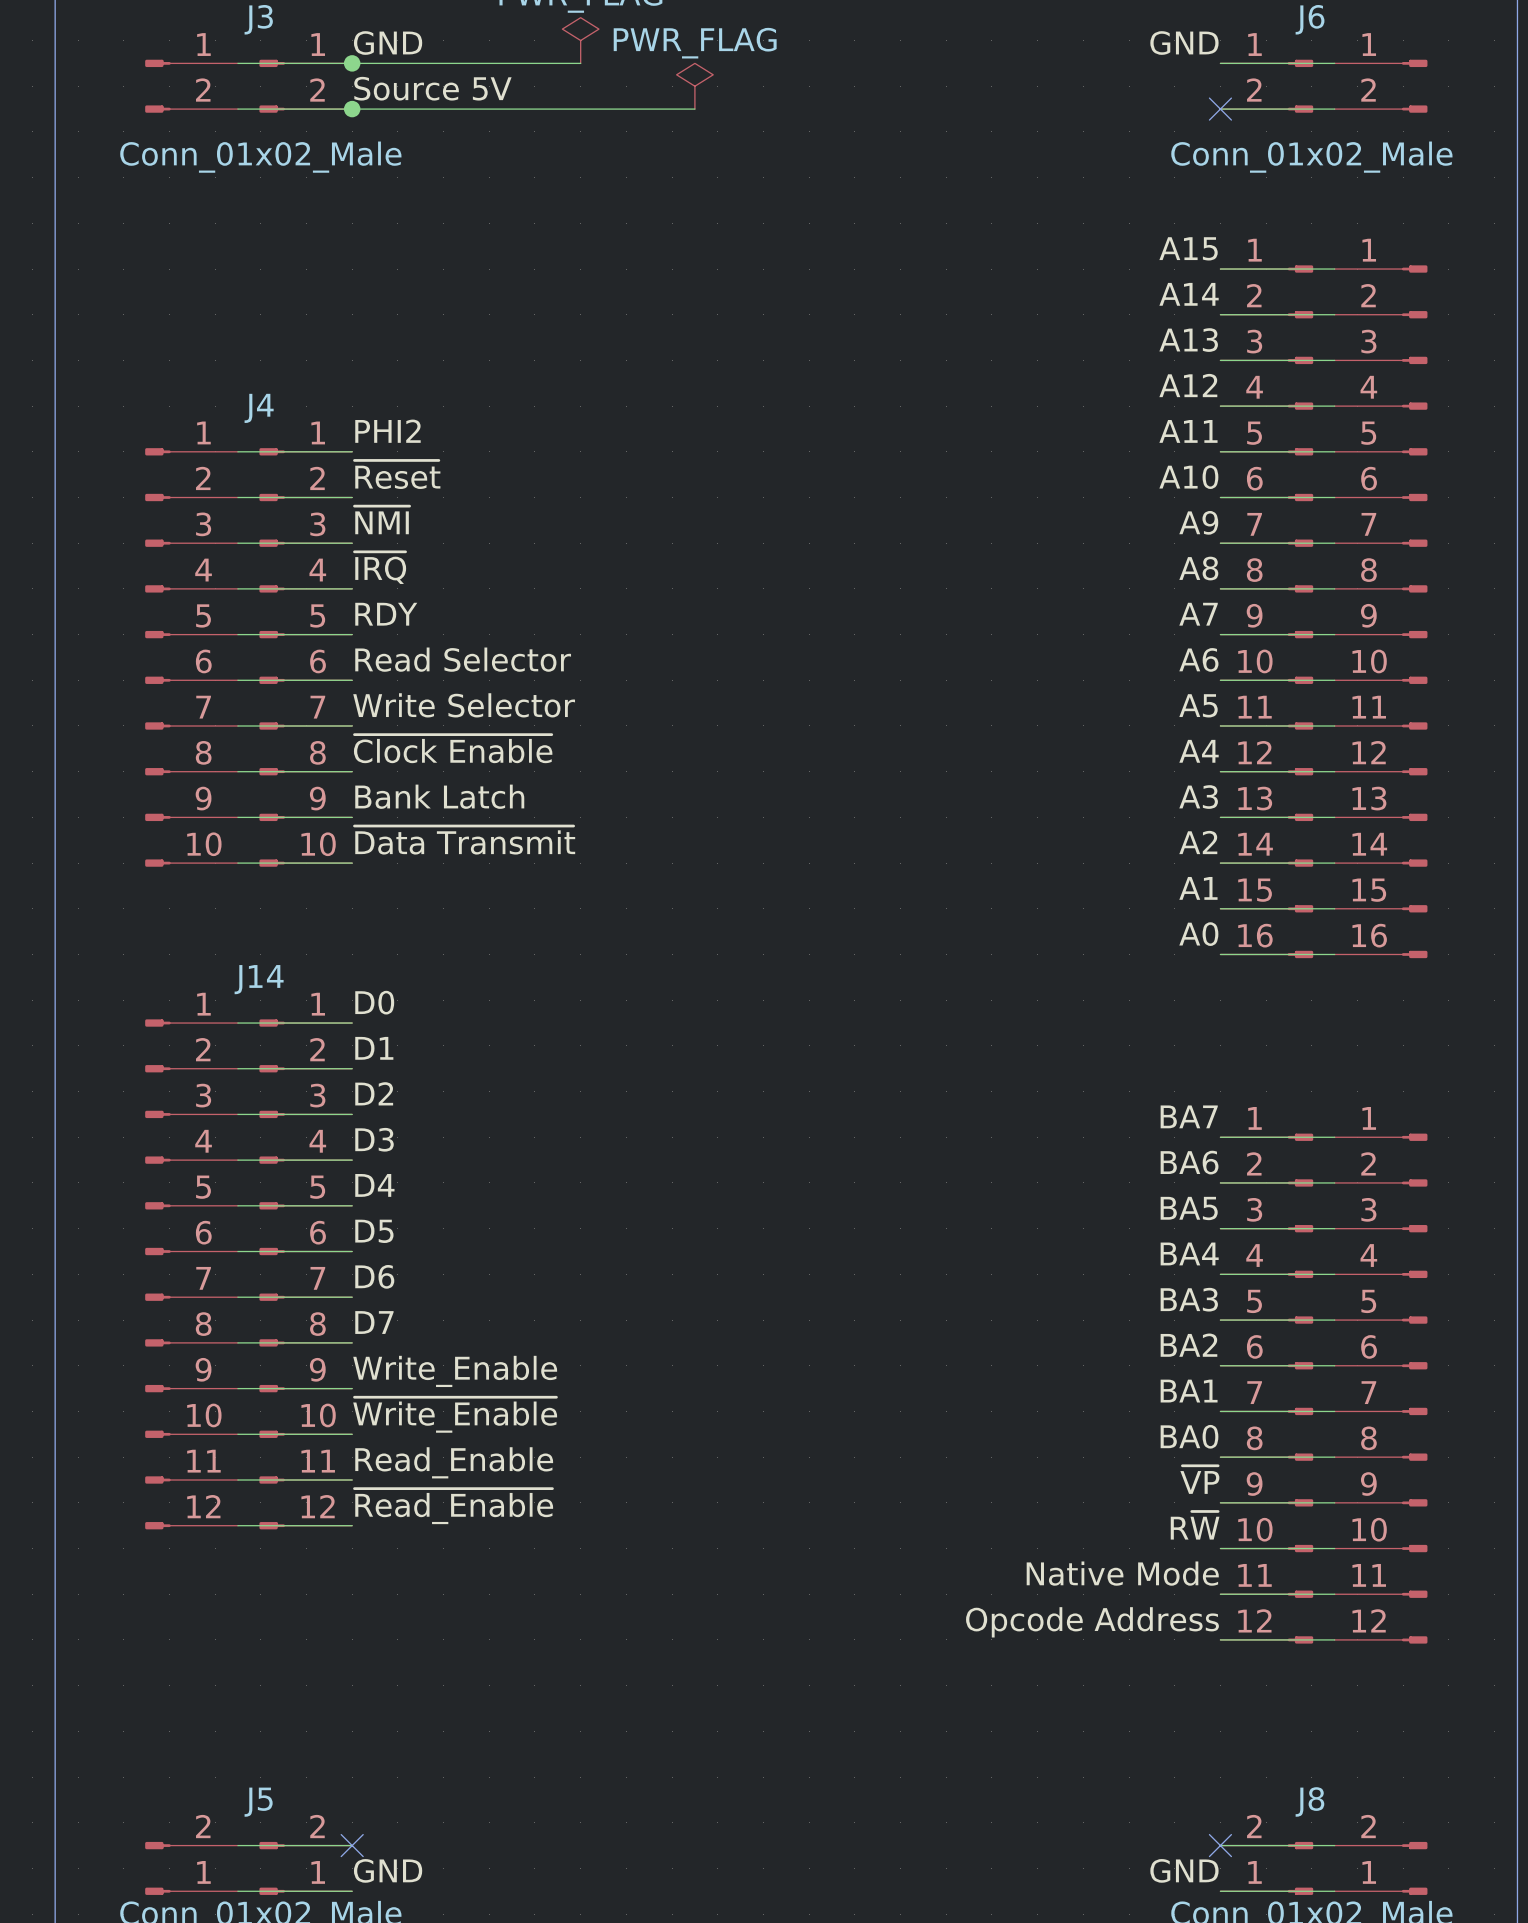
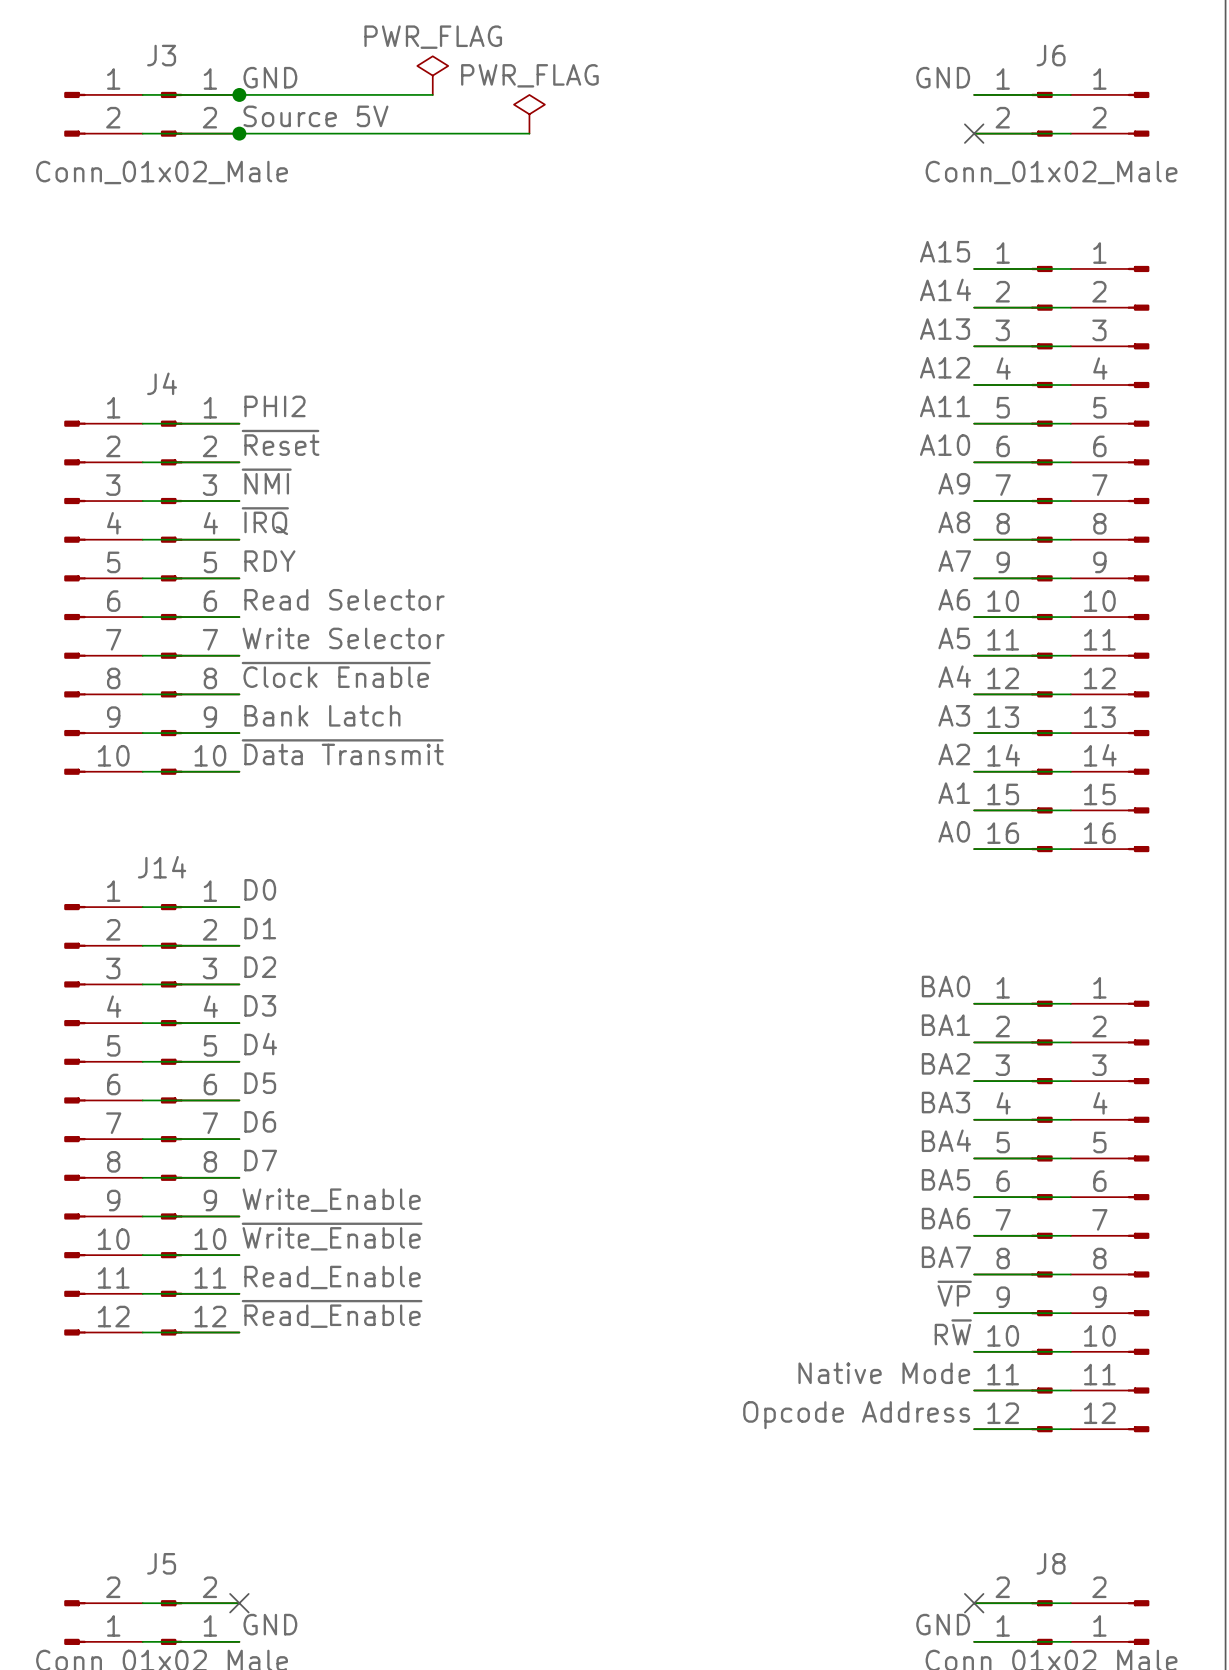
label: BA7 (1189, 1116) -> BA0 (945, 986)
label: BA6 (1189, 1162) -> BA1 (945, 1025)
label: BA5 (1189, 1208) -> BA2 (945, 1063)
label: BA4 (1189, 1253) -> BA3 (945, 1102)
label: BA3 (1189, 1299) -> BA4 (946, 1140)
label: BA2 (1188, 1345) -> BA5 (945, 1179)
label: BA1 (1189, 1391) -> BA6 (945, 1218)
label: BA0 (1189, 1436) -> BA7 (946, 1257)

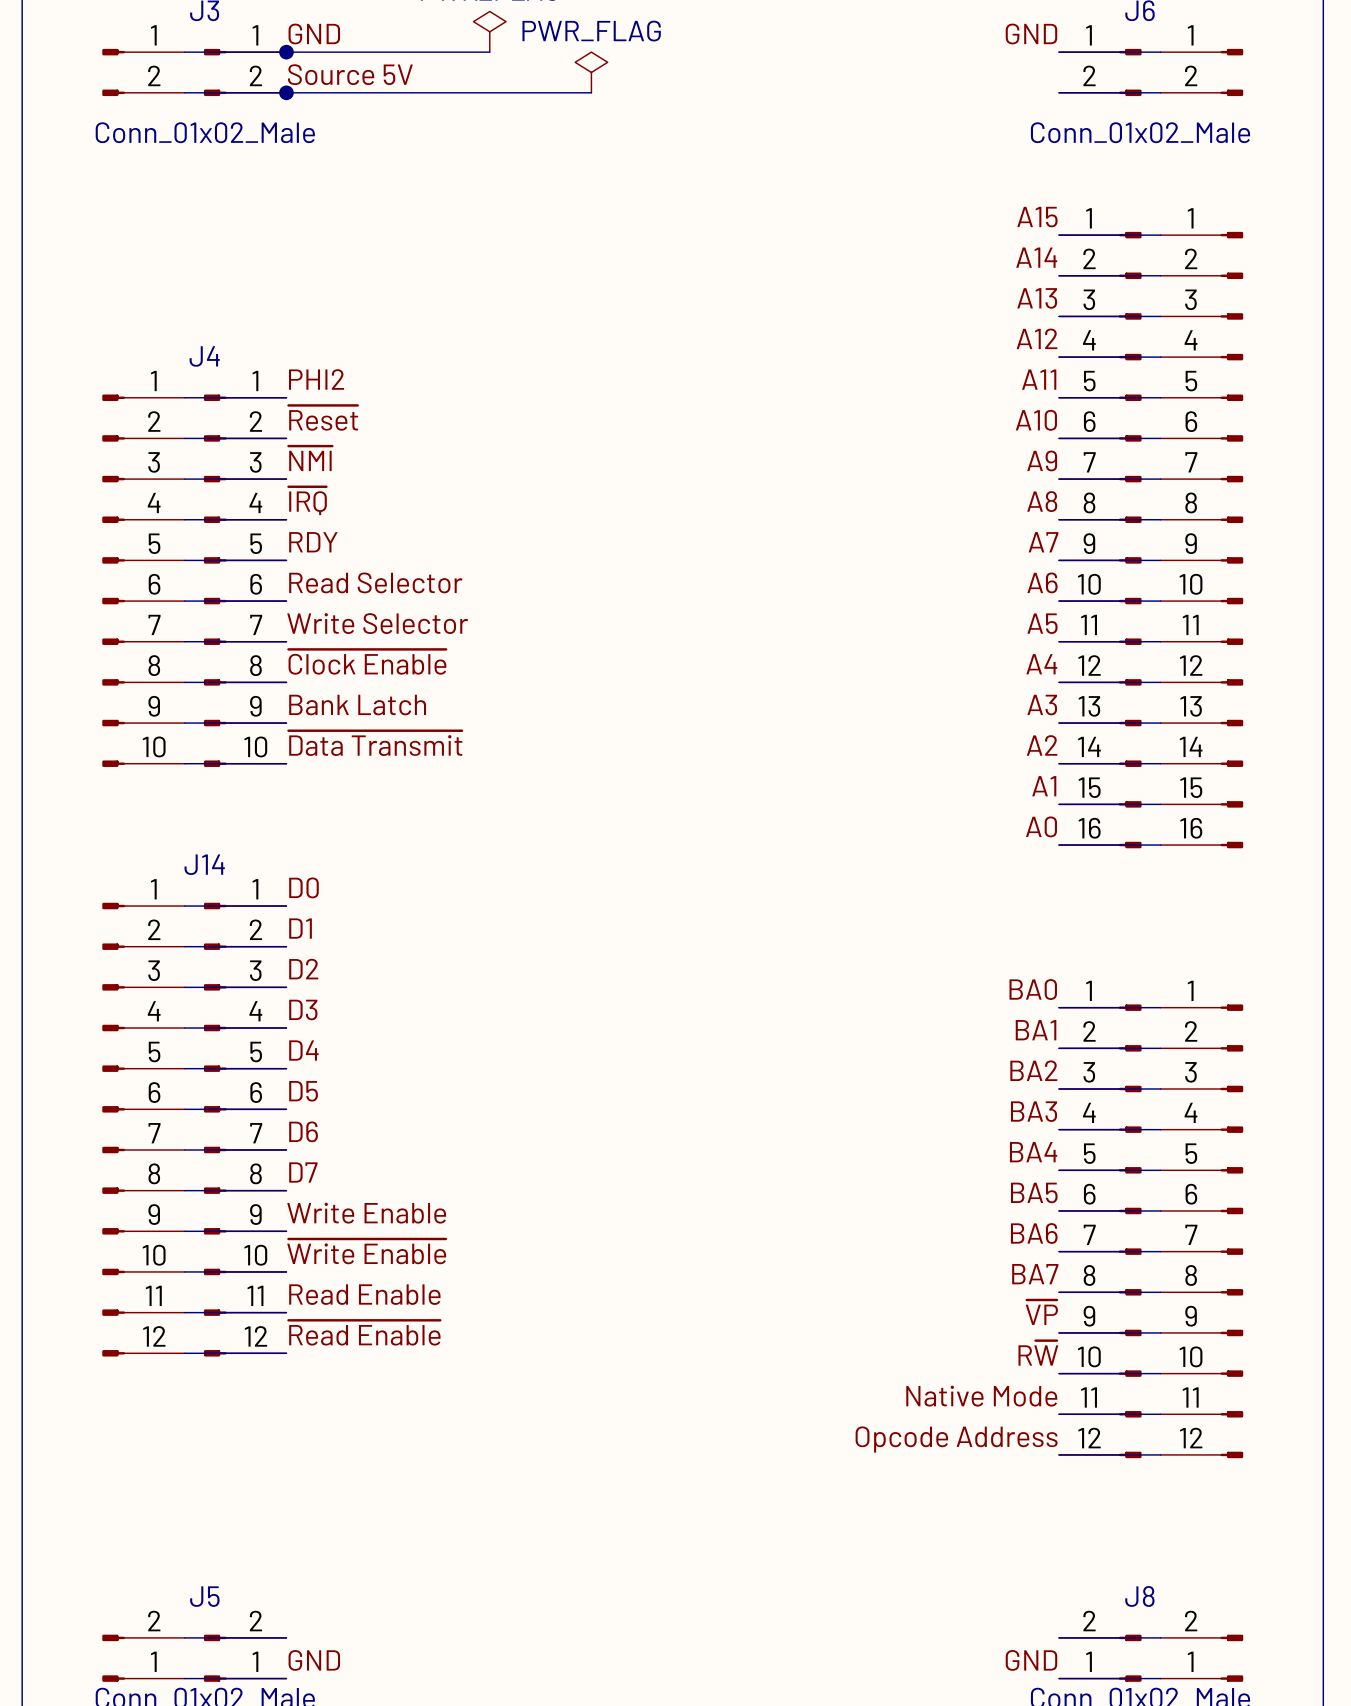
no-connect mark: (974, 133) -> none
label: Write_Enable (331, 1200) -> Write Enable (366, 1213)
label: ~{Write_Enable} (332, 1236) -> ~{Write Enable} (366, 1251)
label: Read_Enable (332, 1277) -> Read Enable (364, 1294)
label: ~{Read_Enable} (332, 1313) -> ~{Read Enable} (364, 1332)
no-connect mark: (239, 1603) -> none
no-connect mark: (974, 1603) -> none

